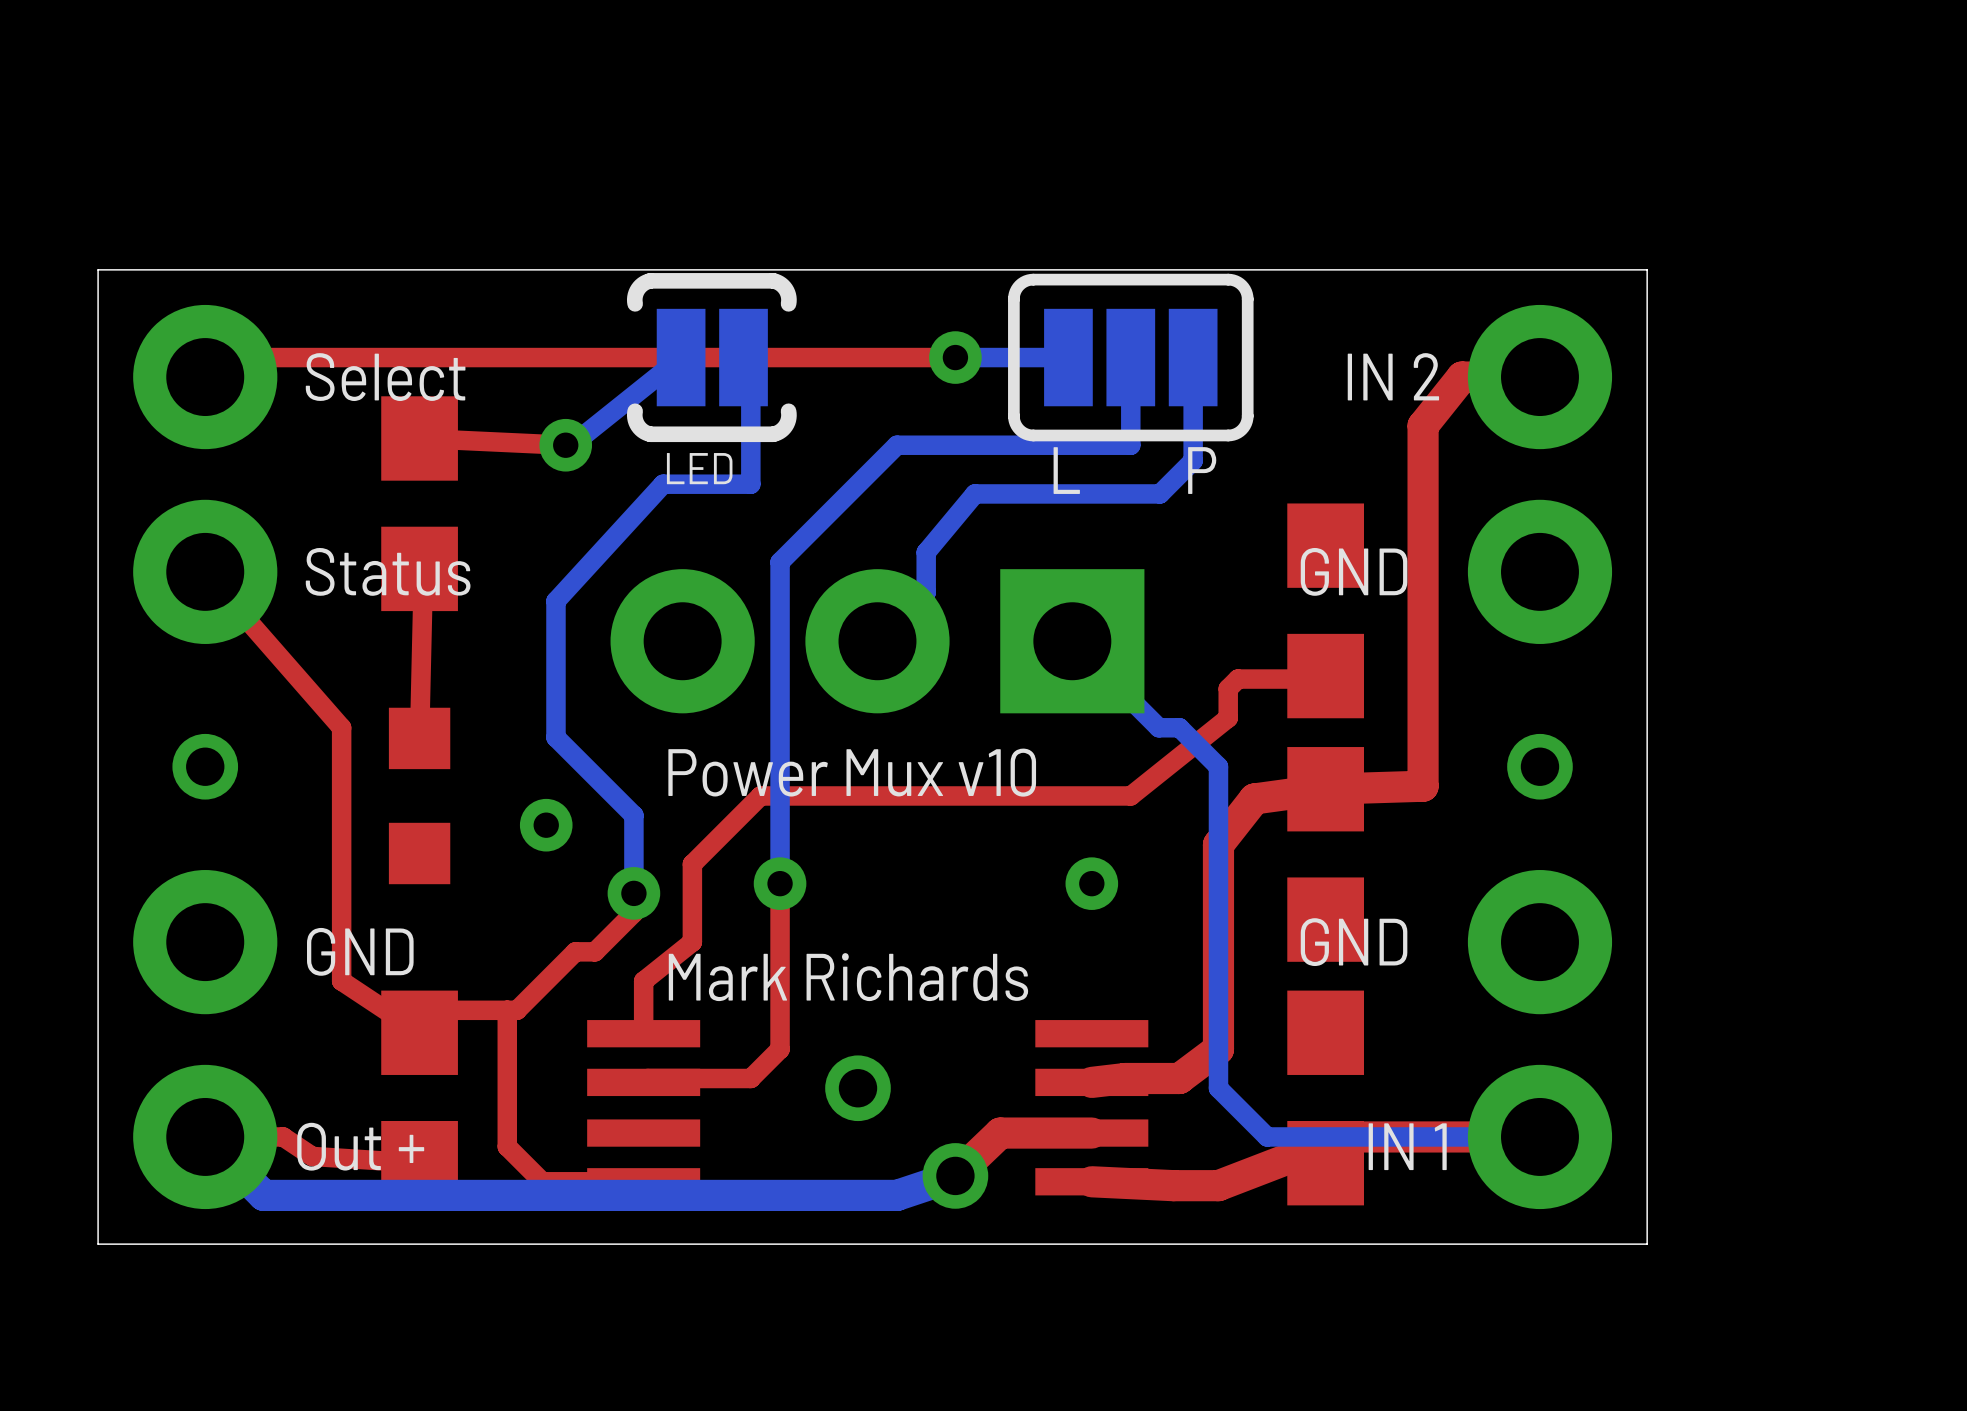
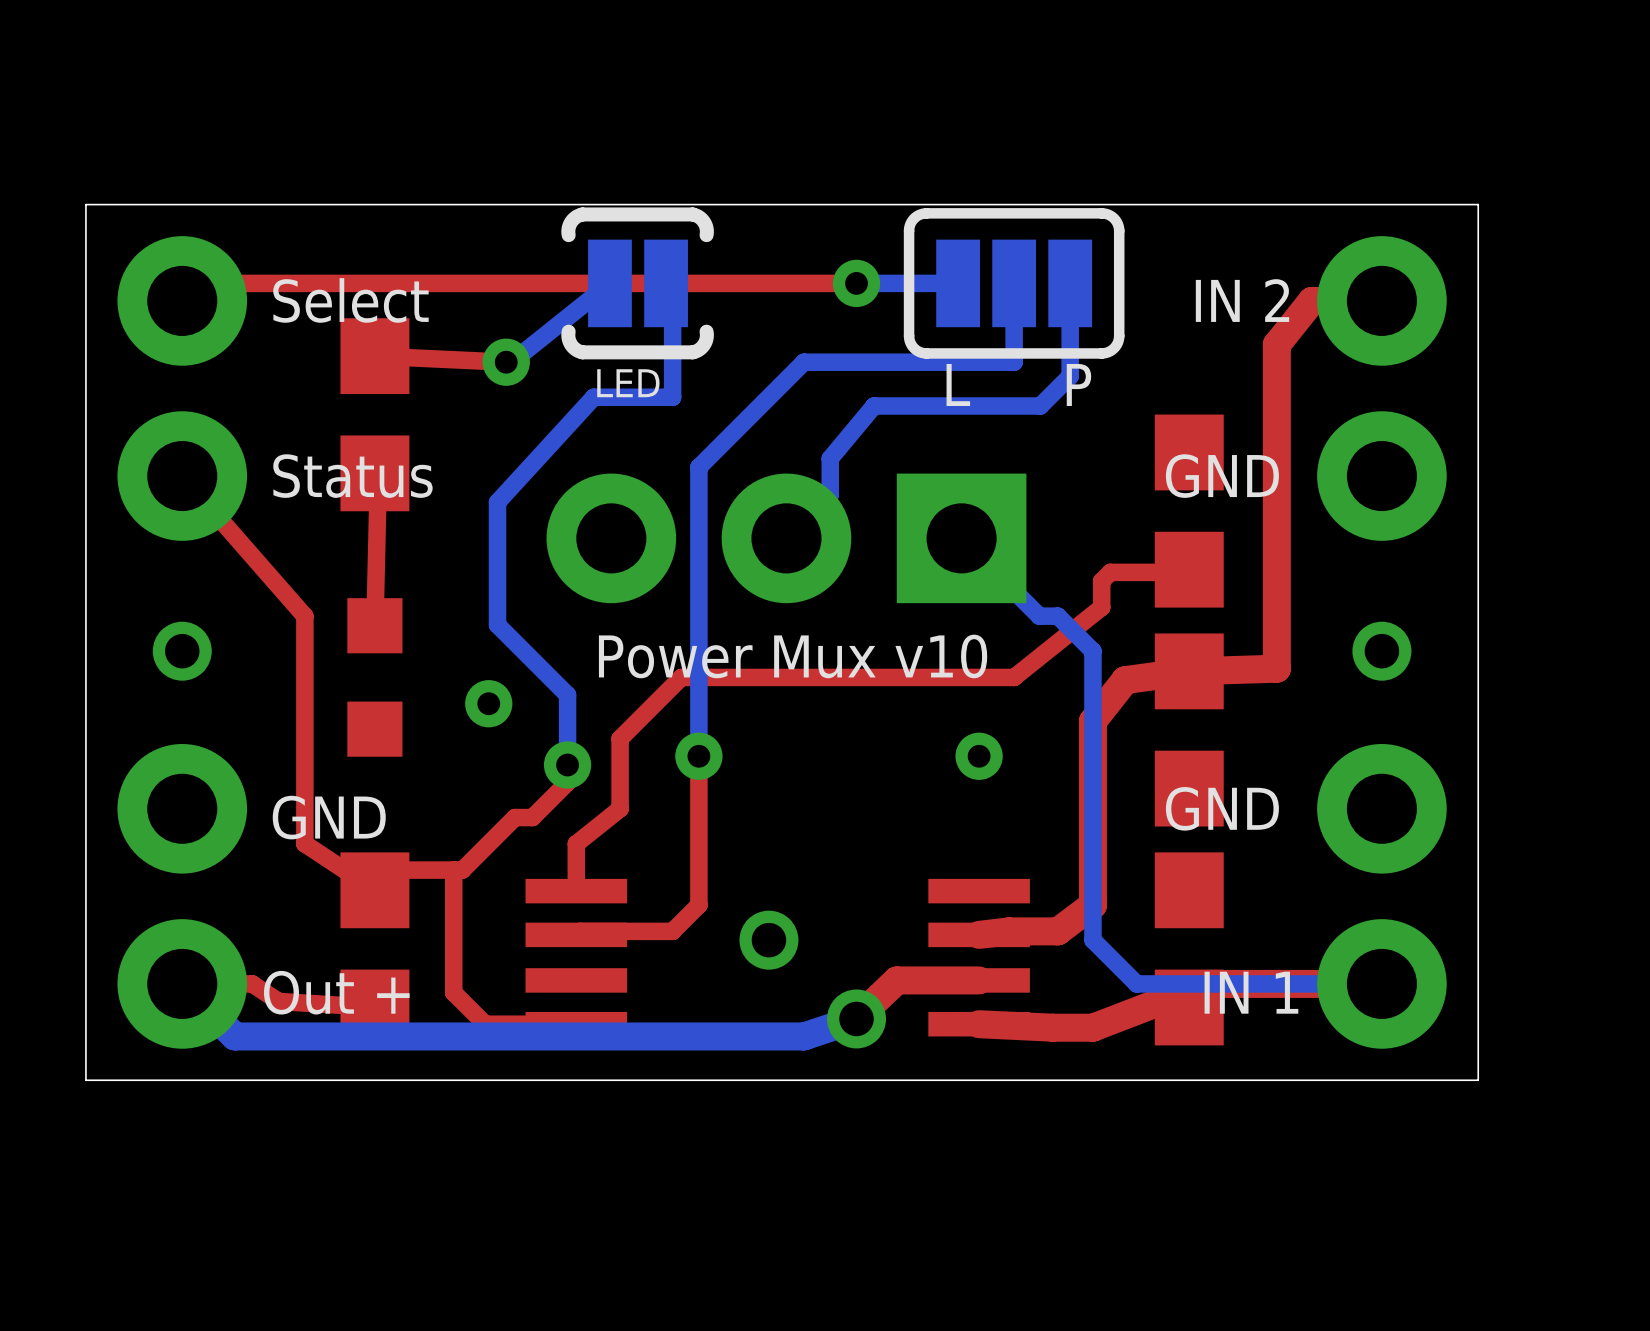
text: Mark Richards (848, 977) -> none

